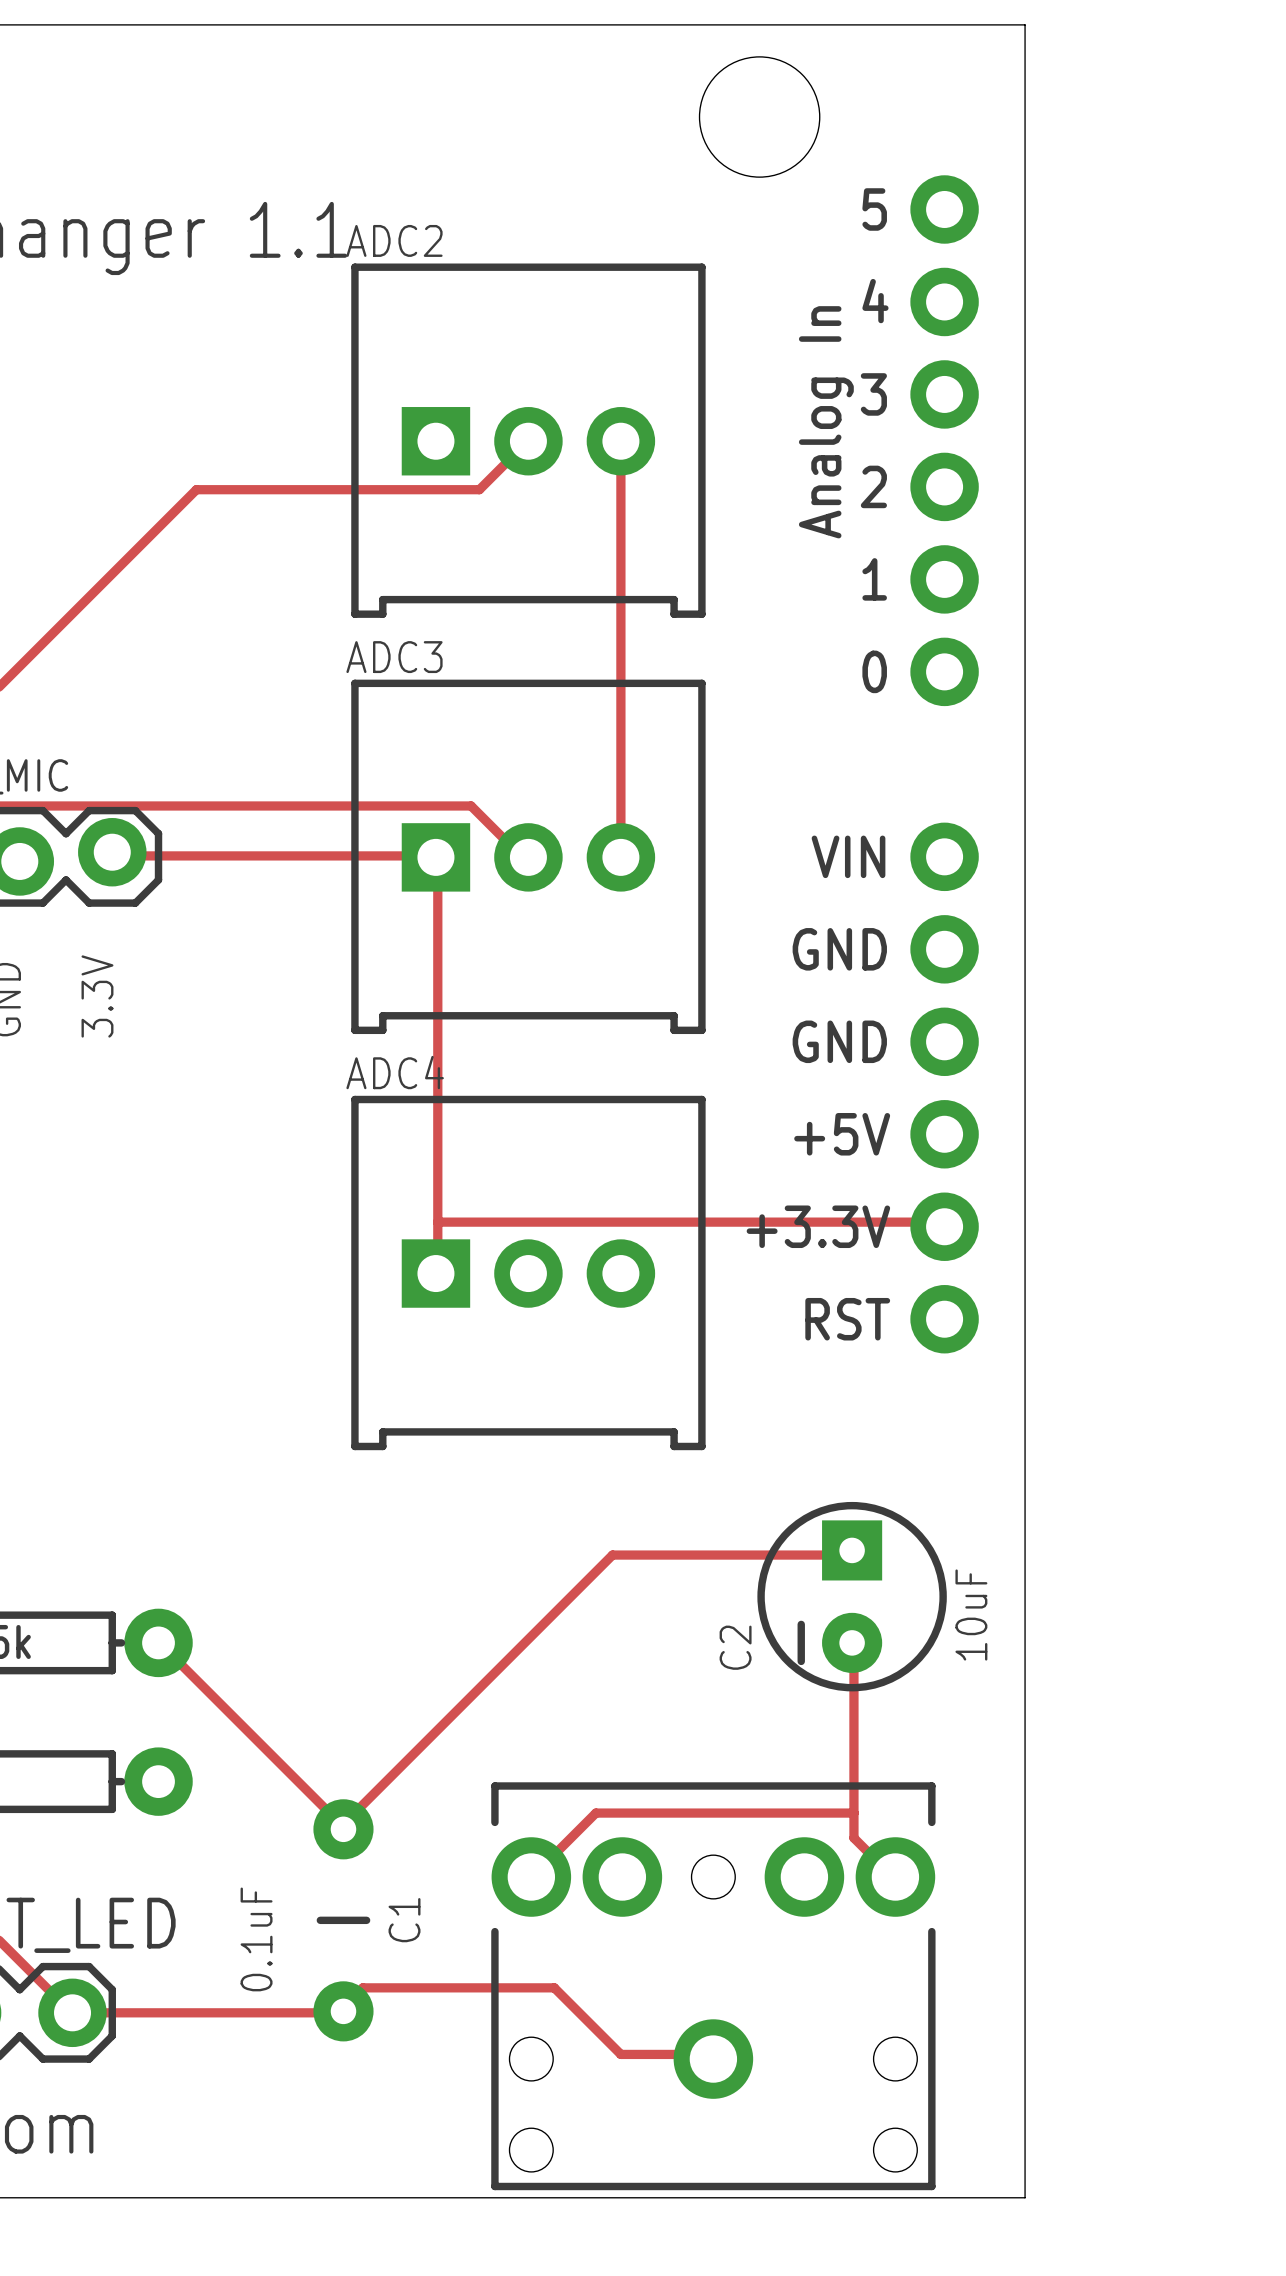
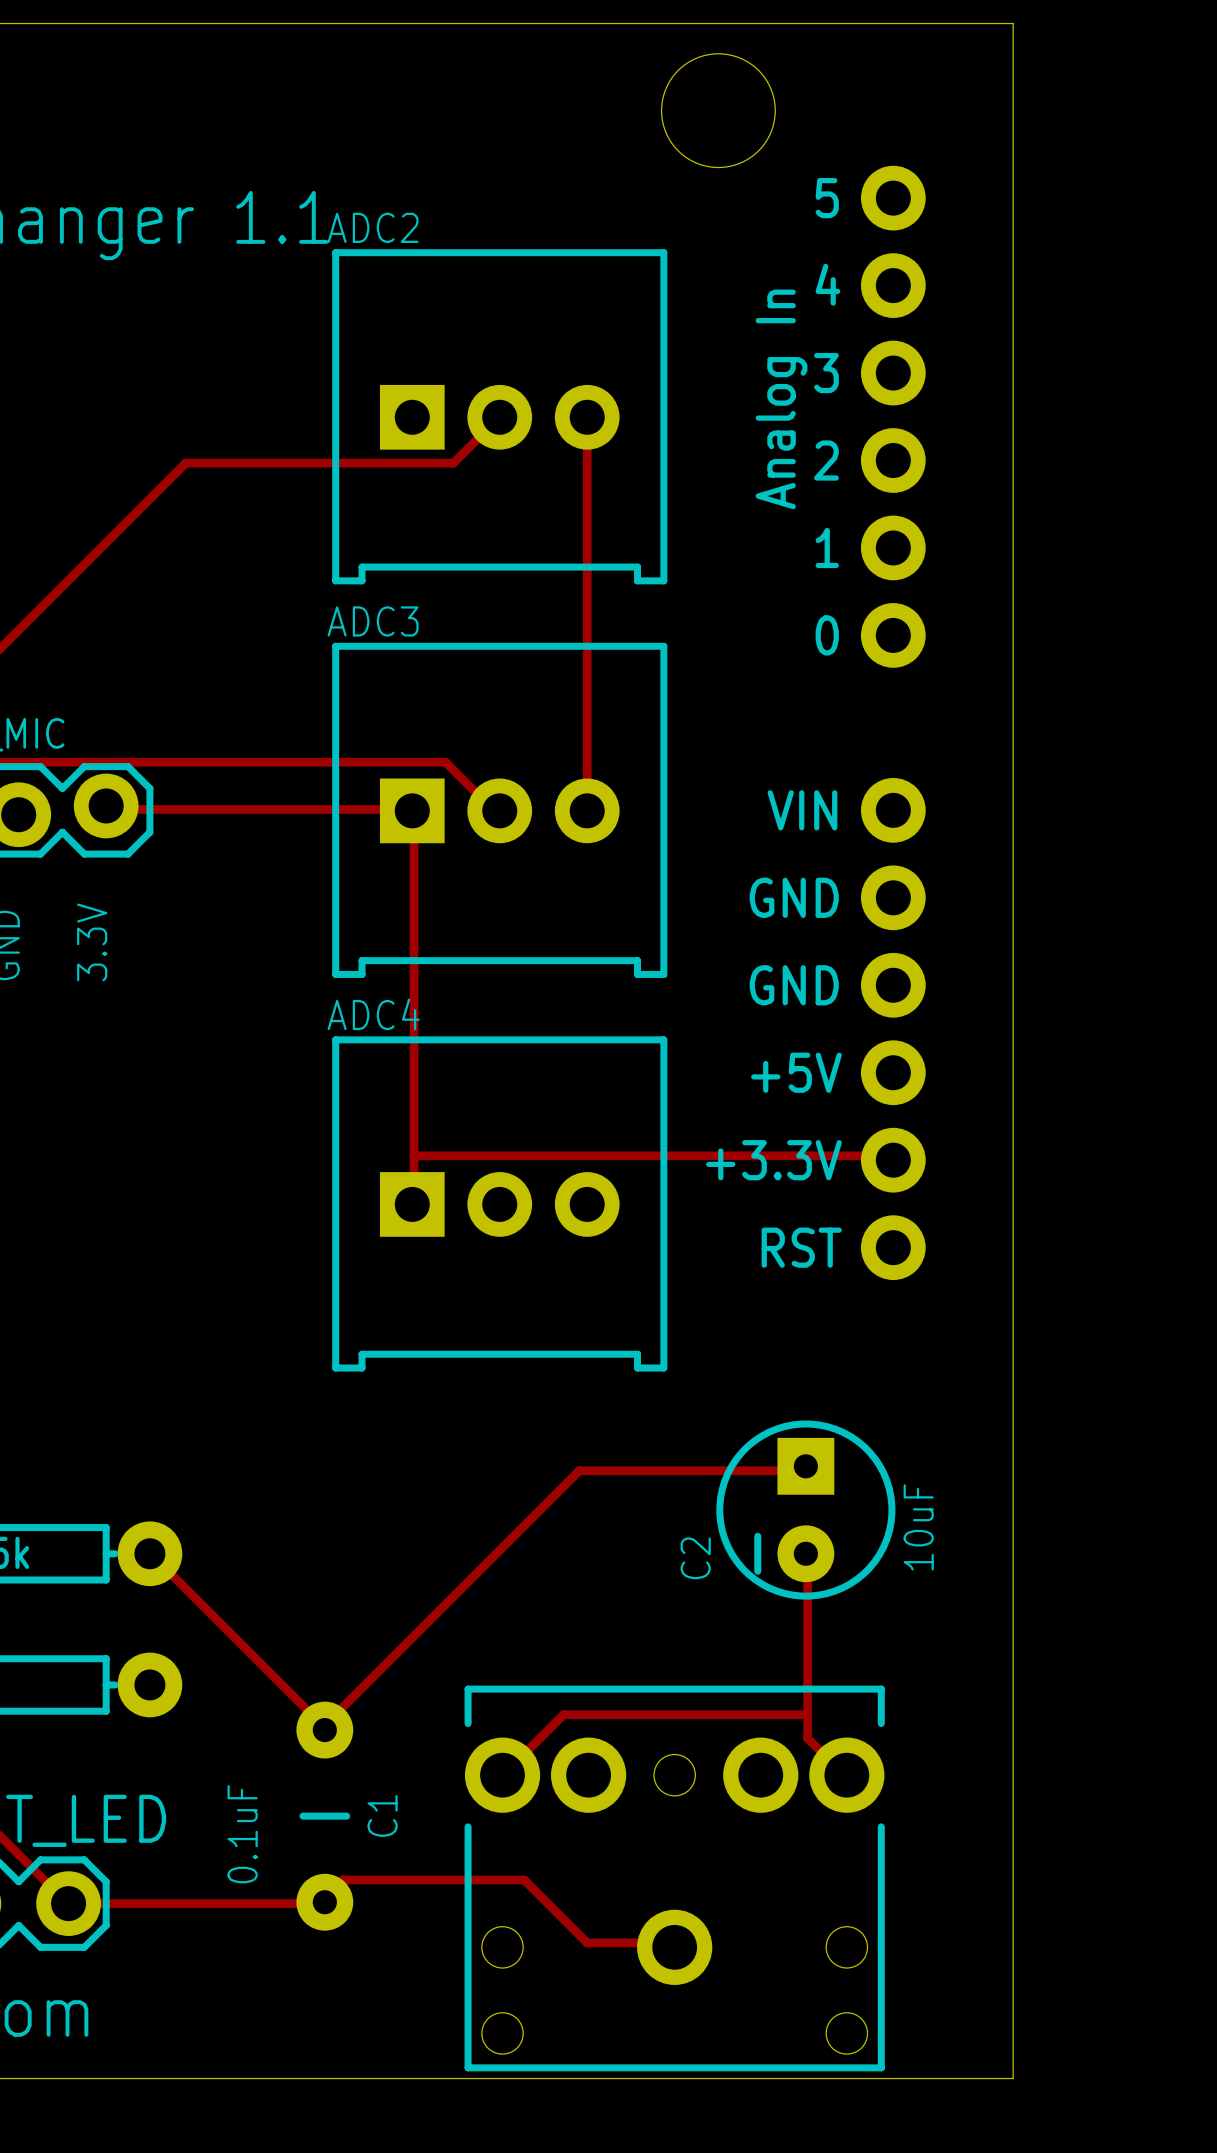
board edge: (1025, 24) (1025, 2197) -> (969, 23) (1013, 23) (1013, 2078) (969, 2078)

